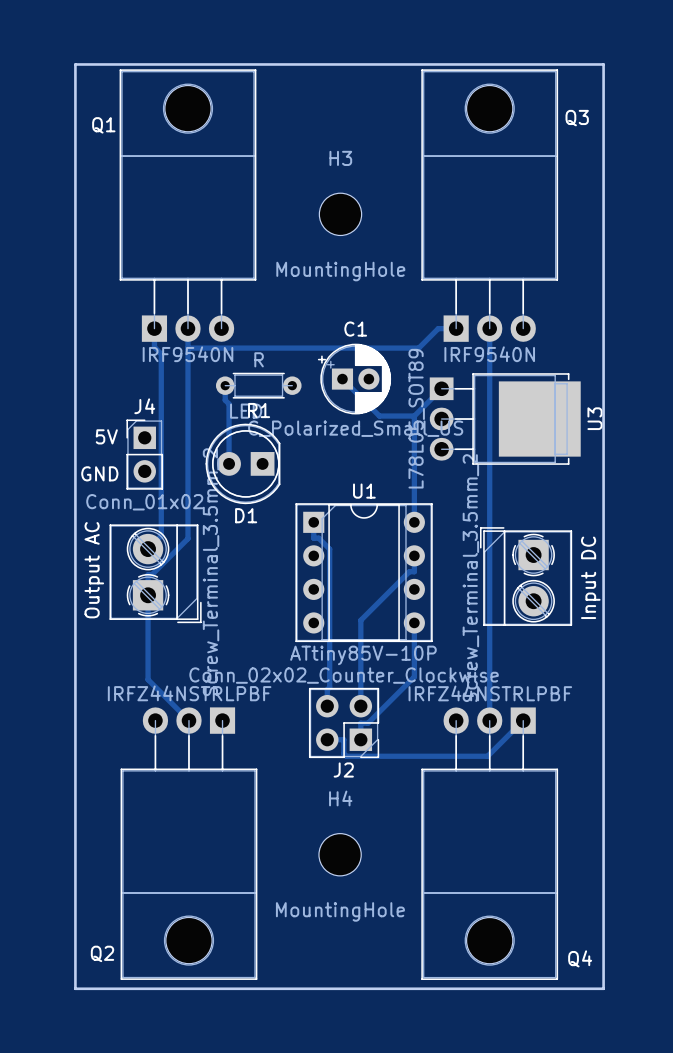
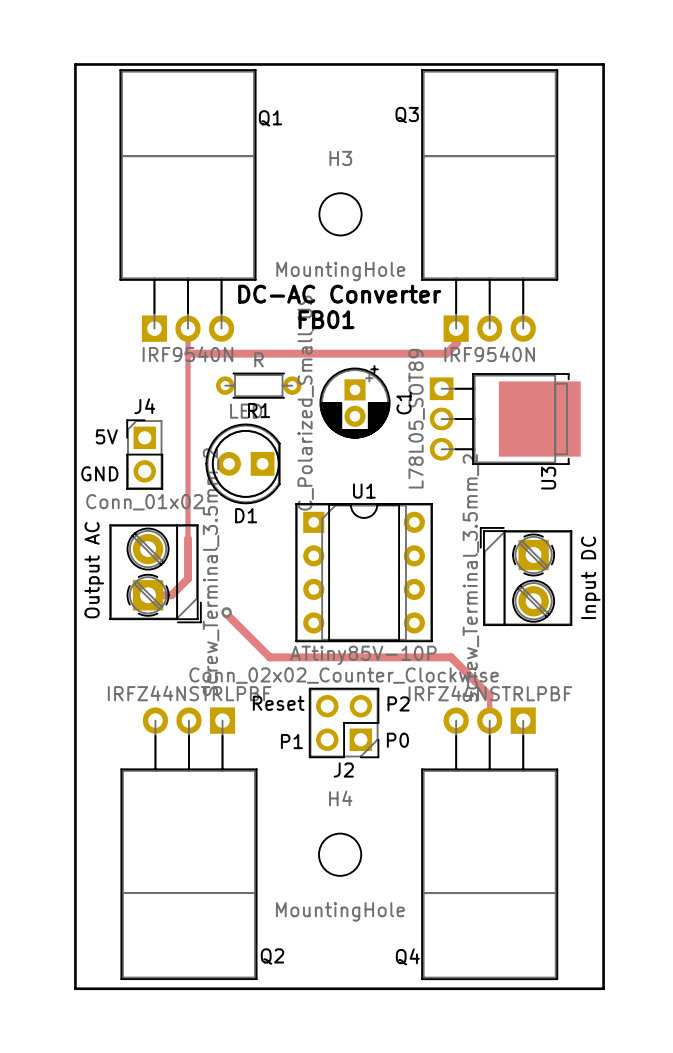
Q1 footprint: [119, 69, 257, 342] -> [119, 69, 257, 342]
Q3 footprint: [421, 69, 559, 342] -> [421, 69, 559, 342]
Q3 name position: Q3 (577, 118) -> Q3 (407, 115)
Q1 name position: Q1 (103, 125) -> Q1 (270, 118)
text: none -> DC-AC Converter (339, 294)
text: none -> FB01 (326, 319)
track: (456, 328) (438, 328) (418, 348) (187, 348) -> (456, 328) (456, 343) (446, 353) (187, 353)
track: (489, 328) (489, 695) -> (226, 612) (269, 657) (451, 657) (489, 695)
track: (154, 335) (154, 347) (161, 353) (161, 535) (148, 549) -> none
track: (342, 379) (379, 416) (414, 416) -> none
C1 rotation: 0° (354, 379) -> 90° clockwise (355, 401)
track: (225, 385) (225, 400) (229, 404) (229, 463) -> none
track: (441, 388) (414, 416) -> none
track: (414, 416) (414, 522) -> none
U3 name position: U3 (595, 418) -> U3 (548, 478)
track: (313, 522) (313, 538) (318, 538) (329, 549) (329, 687) (327, 689) (327, 706) -> none
track: (187, 538) (151, 574) (148, 574) (148, 679) (188, 720) -> (187, 538) (187, 578) (171, 595) (148, 595)
track: (414, 555) (414, 571) (409, 571) (360, 620) (360, 706) -> none
via: none -> (226, 612)
track: (414, 622) (414, 676) (368, 723) (360, 723) (360, 739) -> none
text: none -> Reset (278, 703)
text: none -> P2 (398, 703)
Q2 footprint: [120, 707, 258, 980] -> [120, 707, 258, 980]
Q4 footprint: [421, 707, 559, 980] -> [421, 707, 559, 980]
track: (523, 720) (487, 756) (346, 756) (343, 753) (343, 739) (327, 739) -> none
text: none -> P0 (397, 740)
text: none -> P1 (291, 741)
Q2 name position: Q2 (102, 953) -> Q2 (272, 956)
Q4 name position: Q4 (580, 958) -> Q4 (407, 956)

